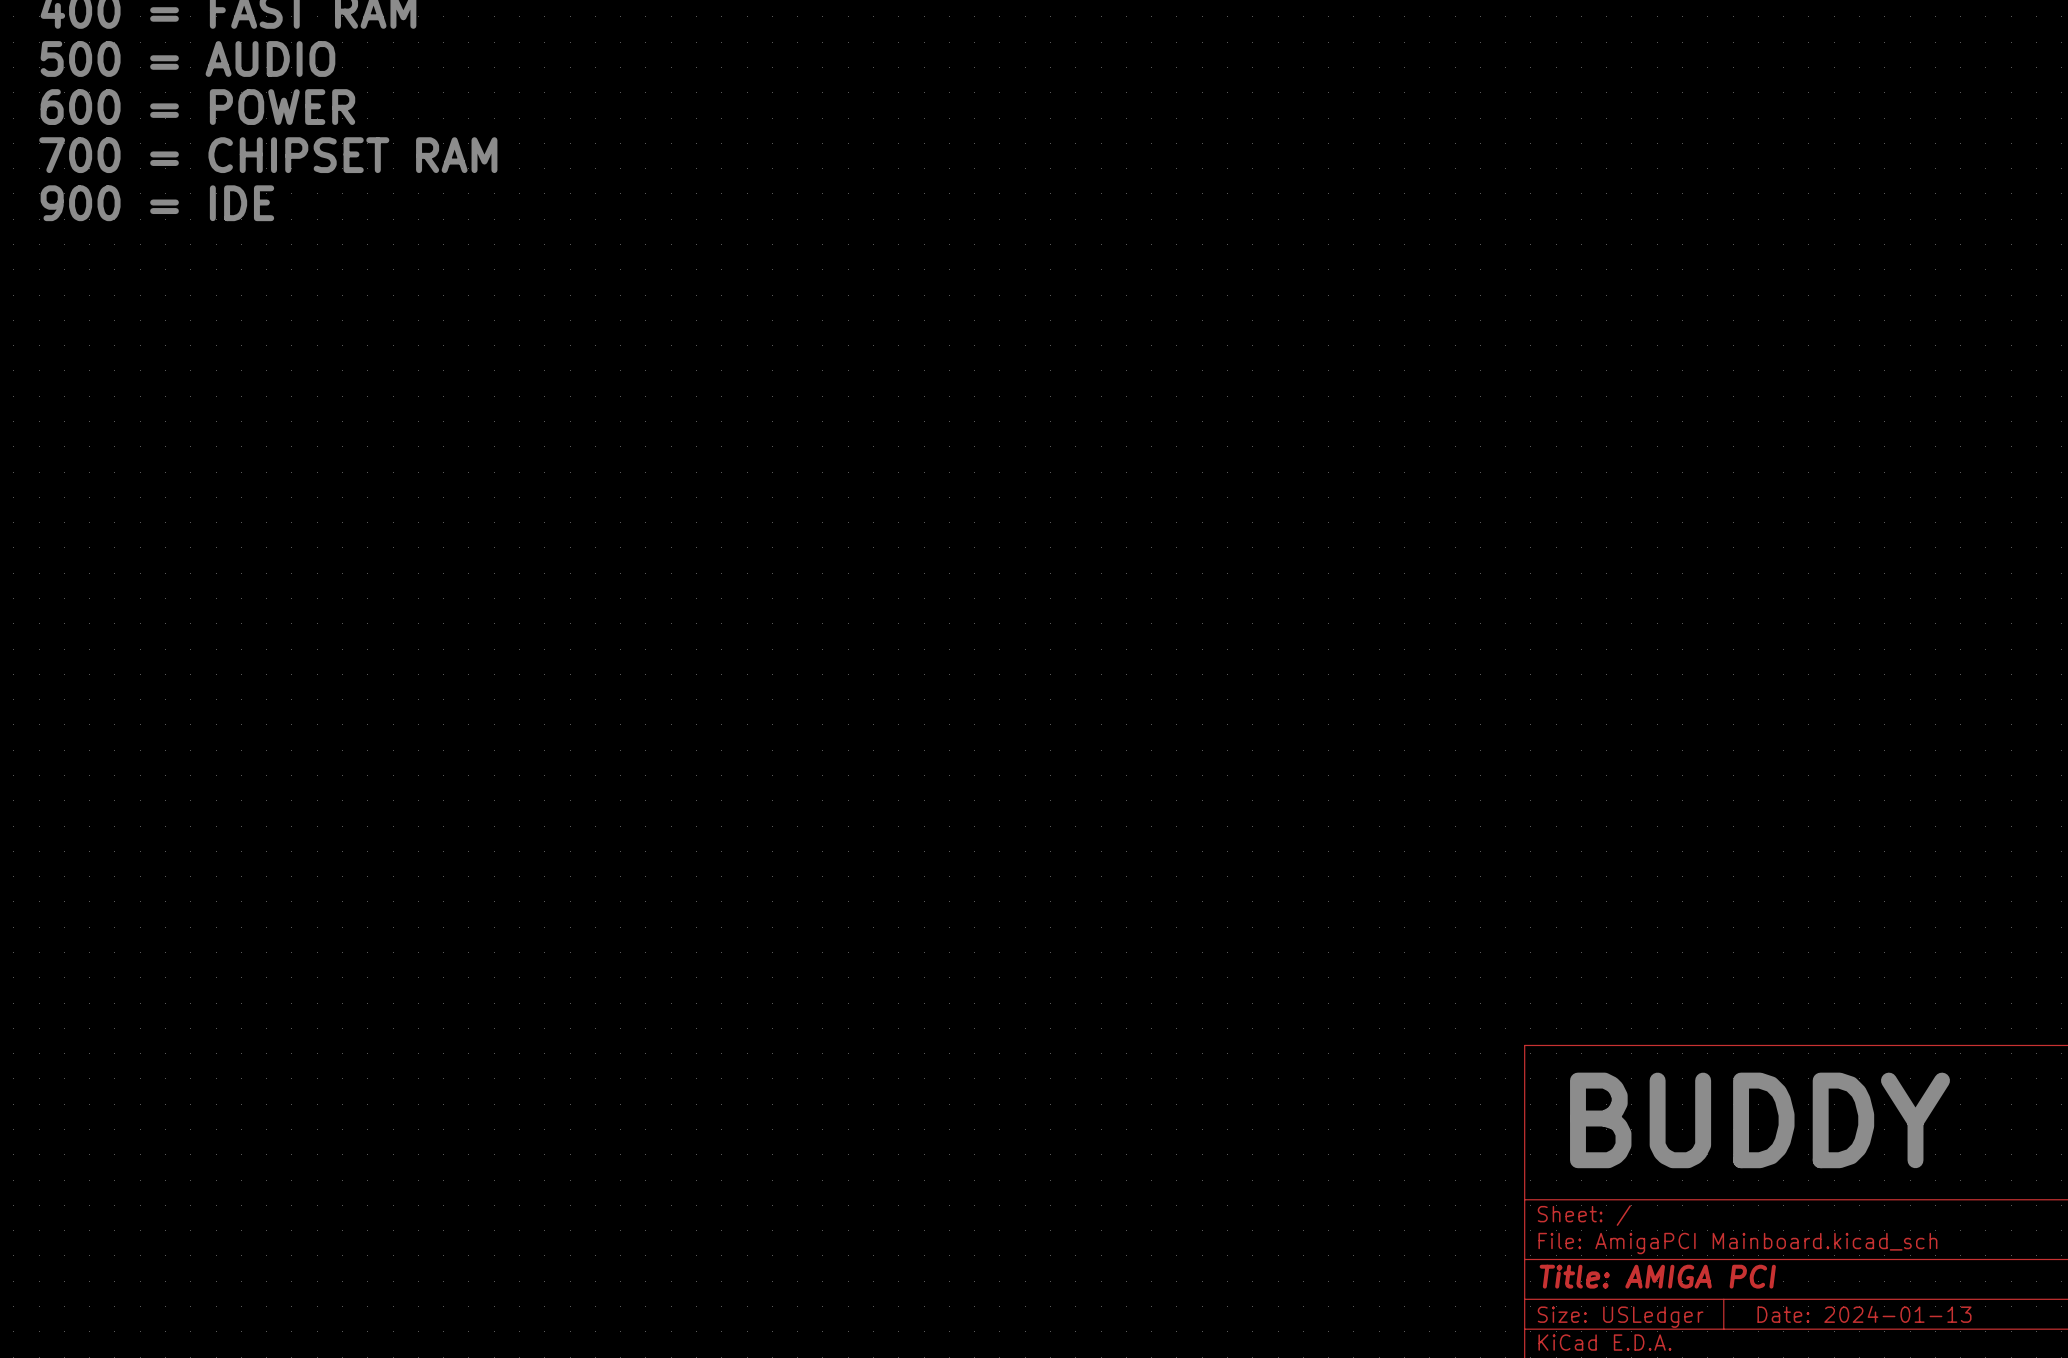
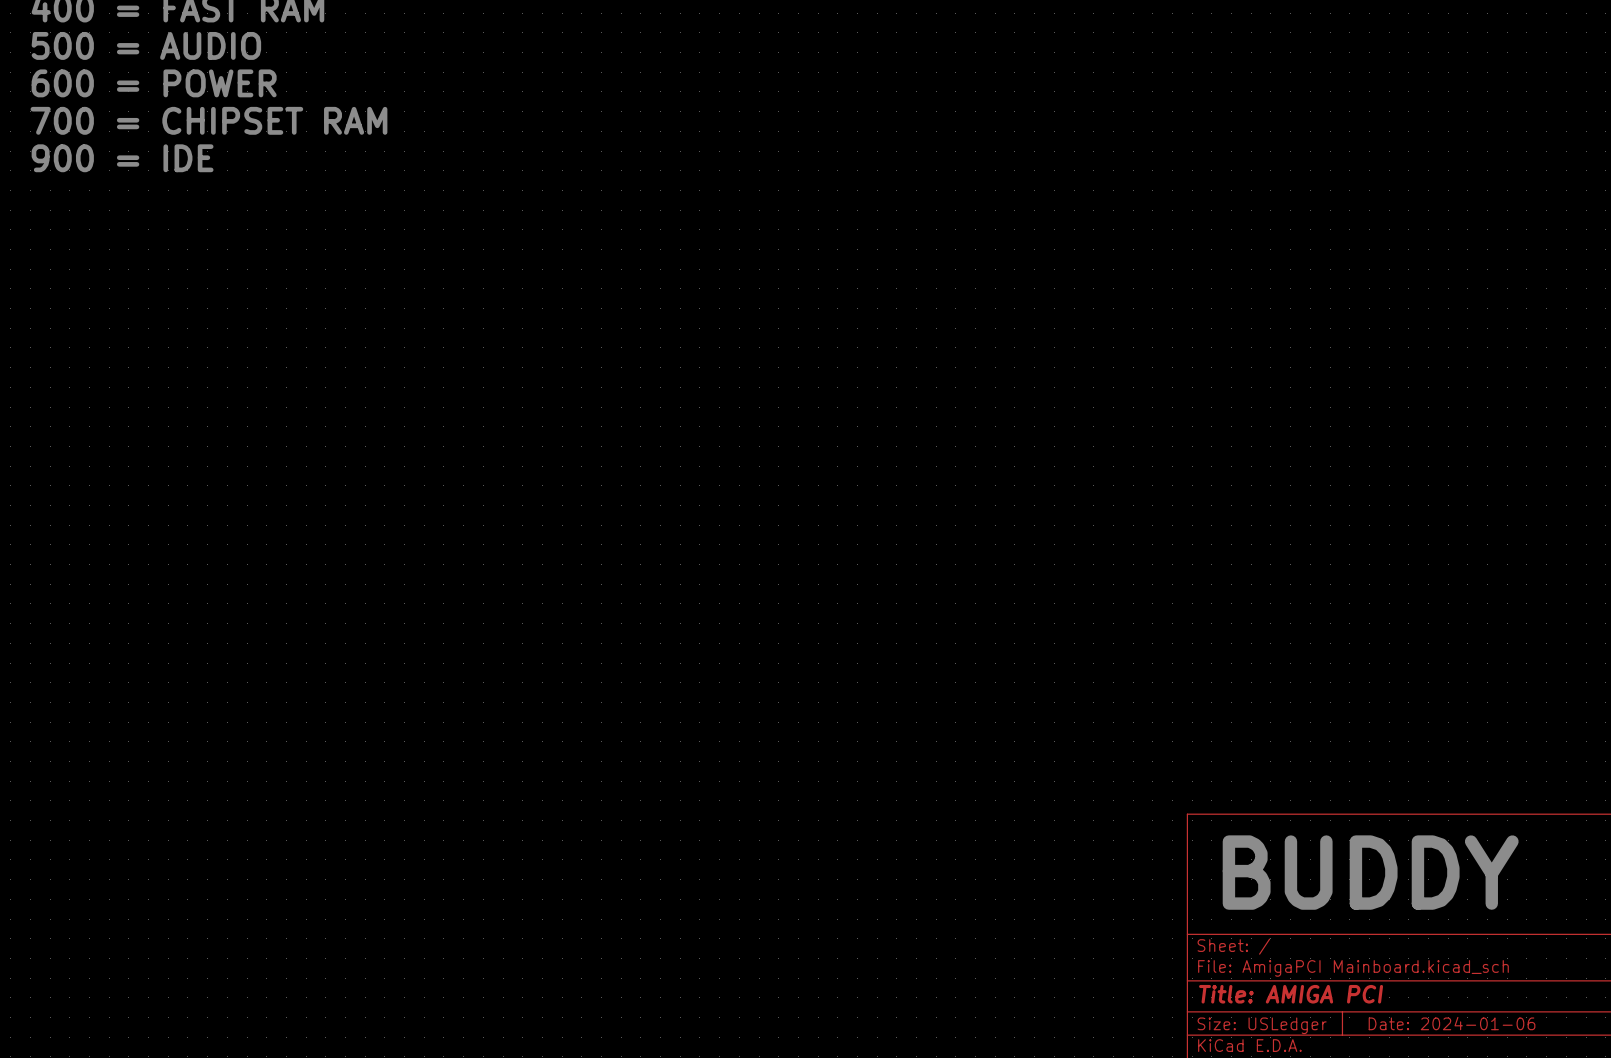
title block: Date: 2024-01-13 (1864, 1314) -> Date: 2024-01-06 (1452, 1023)

